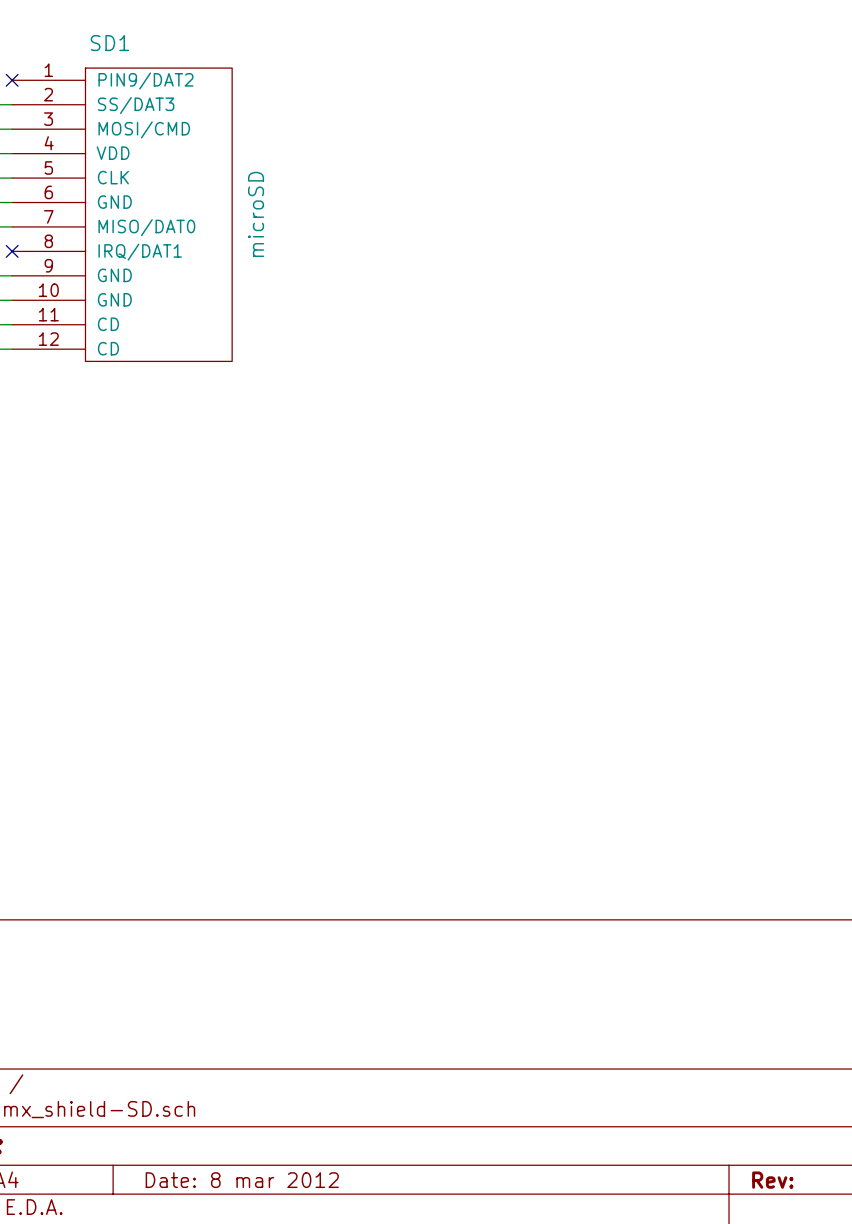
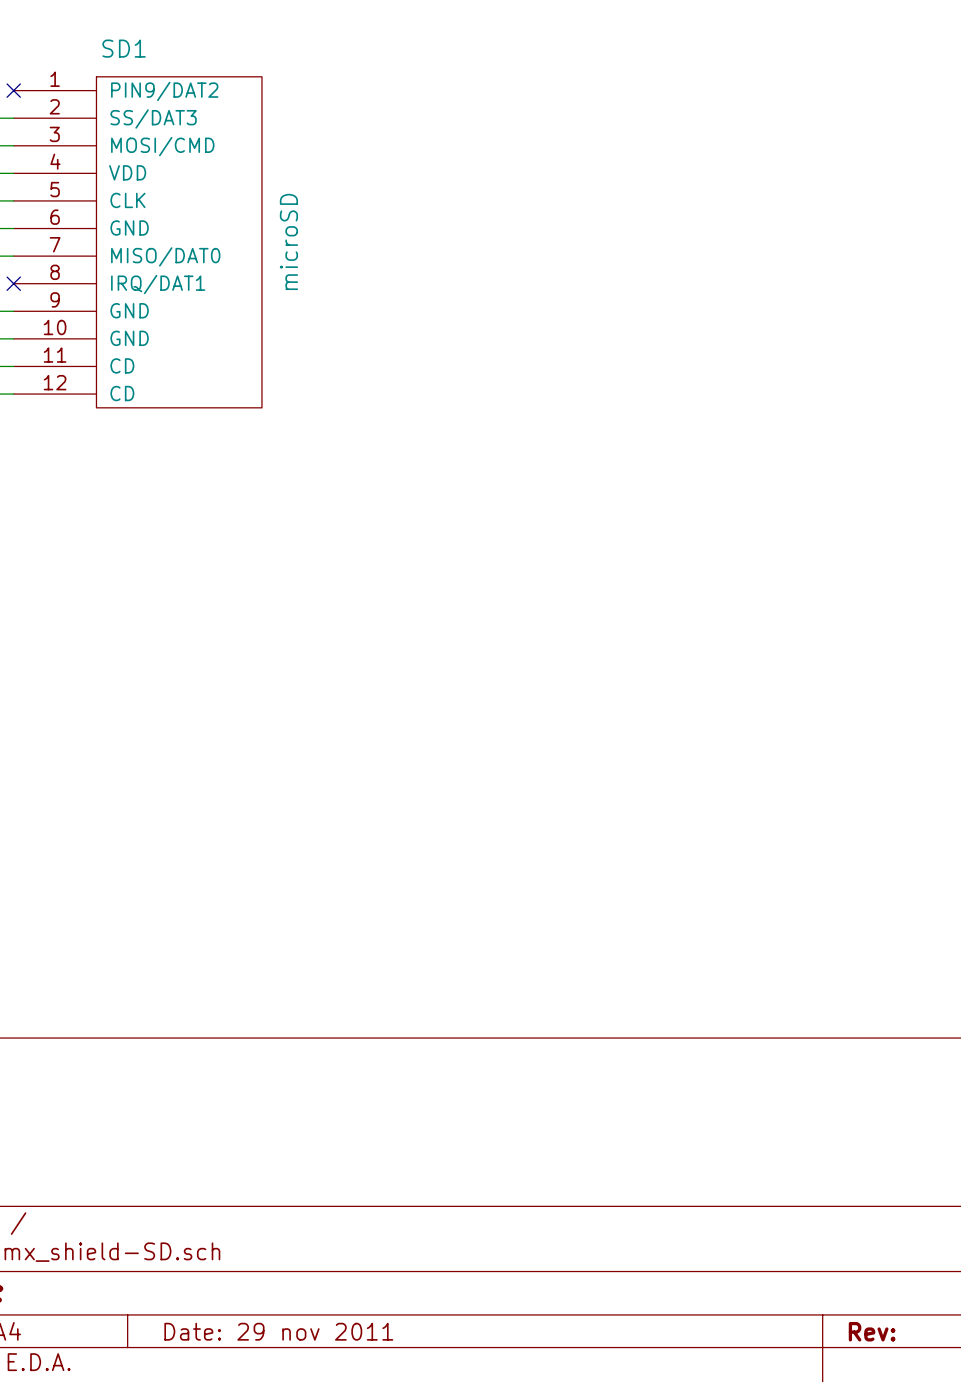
title block: Date: 8 mar 2012 (242, 1180) -> Date: 29 nov 2011 (278, 1331)

